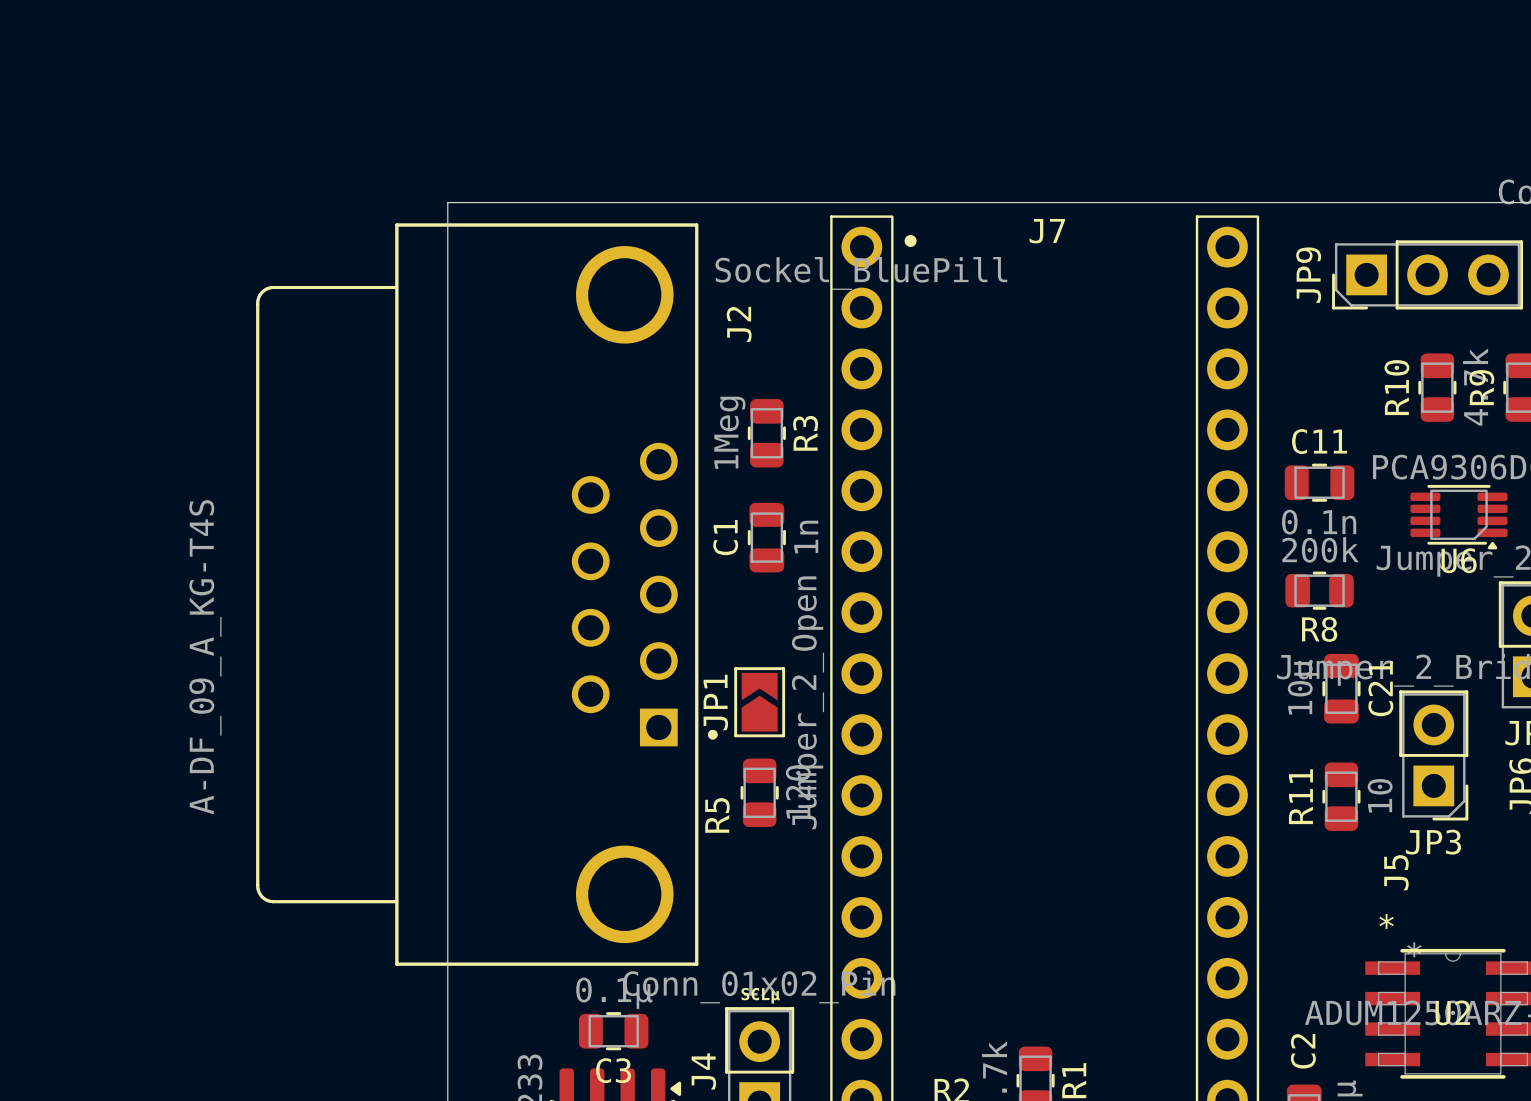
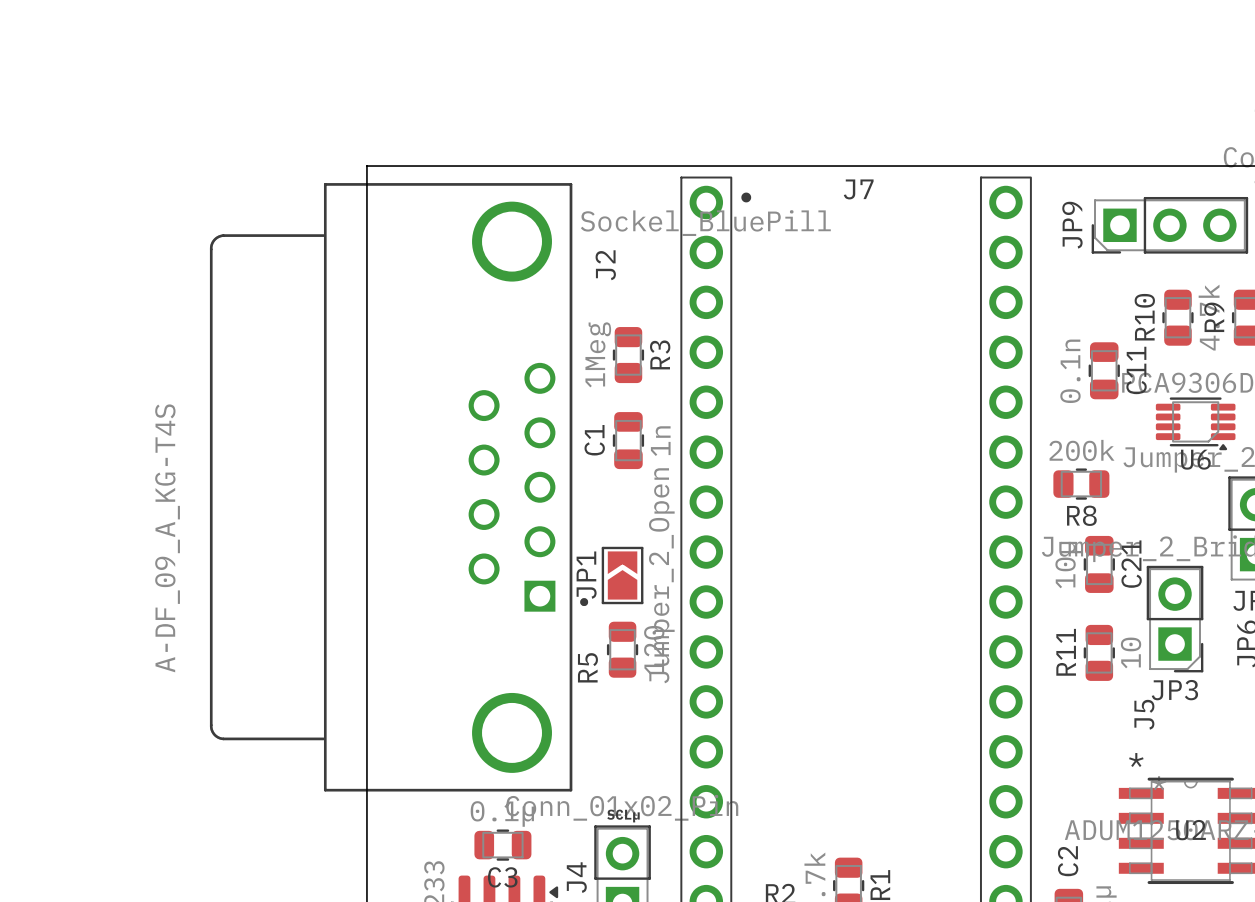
C11 rotation: 0° (1319, 482) -> 90° clockwise (1104, 370)

